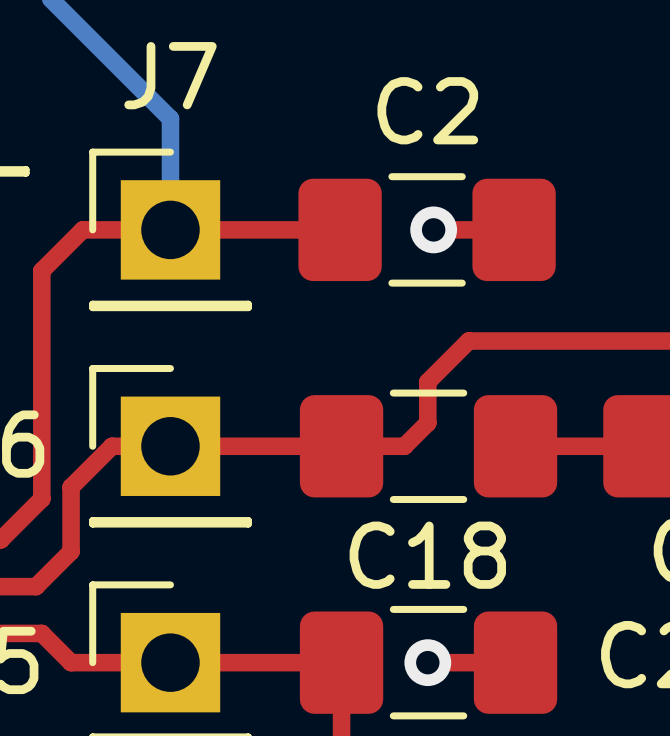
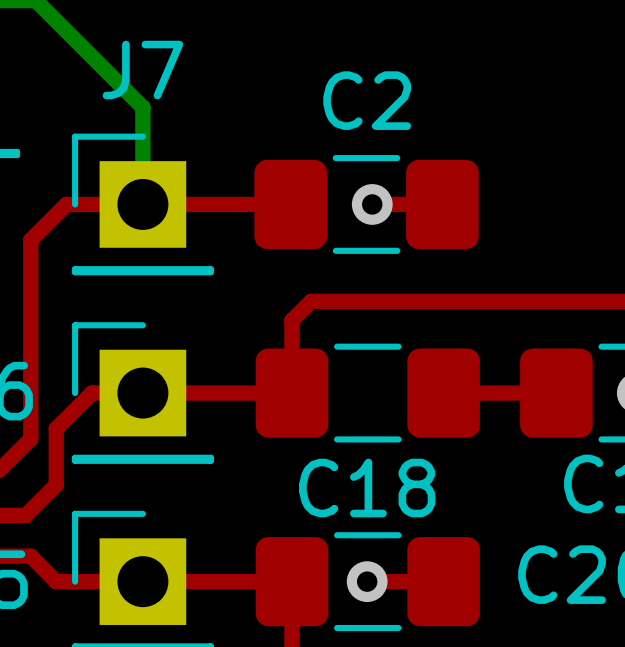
top track: (468, 341) (427, 381) (427, 422) (404, 446) (341, 446) -> (402, 301) (311, 301) (291, 320) (291, 393)

